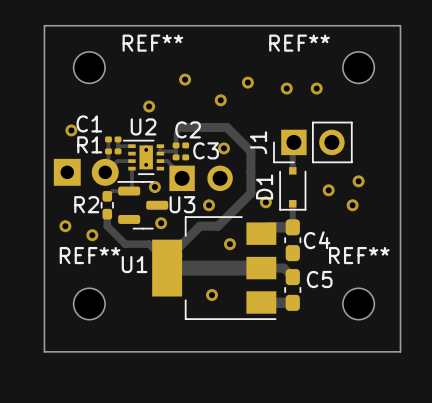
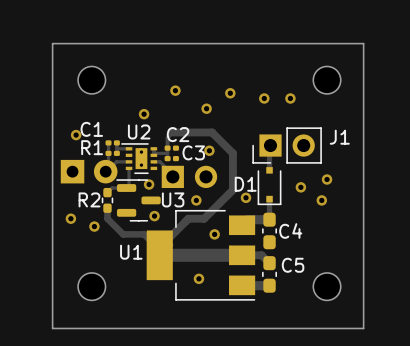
REF** name: REF** (152, 43) -> none
REF** name: REF** (299, 43) -> none
J1 name rotation: 0° (258, 142) -> 90° clockwise (339, 137)
J1 name position: J1 (258, 142) -> J1 (339, 137)
D1 name rotation: 0° (264, 186) -> 90° clockwise (245, 184)
REF** name: REF** (90, 255) -> none
REF** name: REF** (359, 255) -> none

